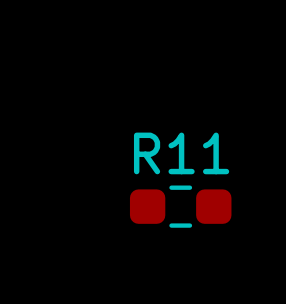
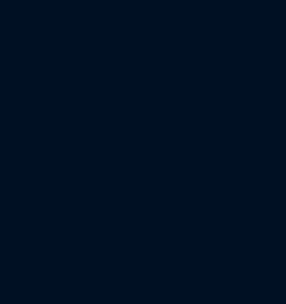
R11: (180, 206) -> none

